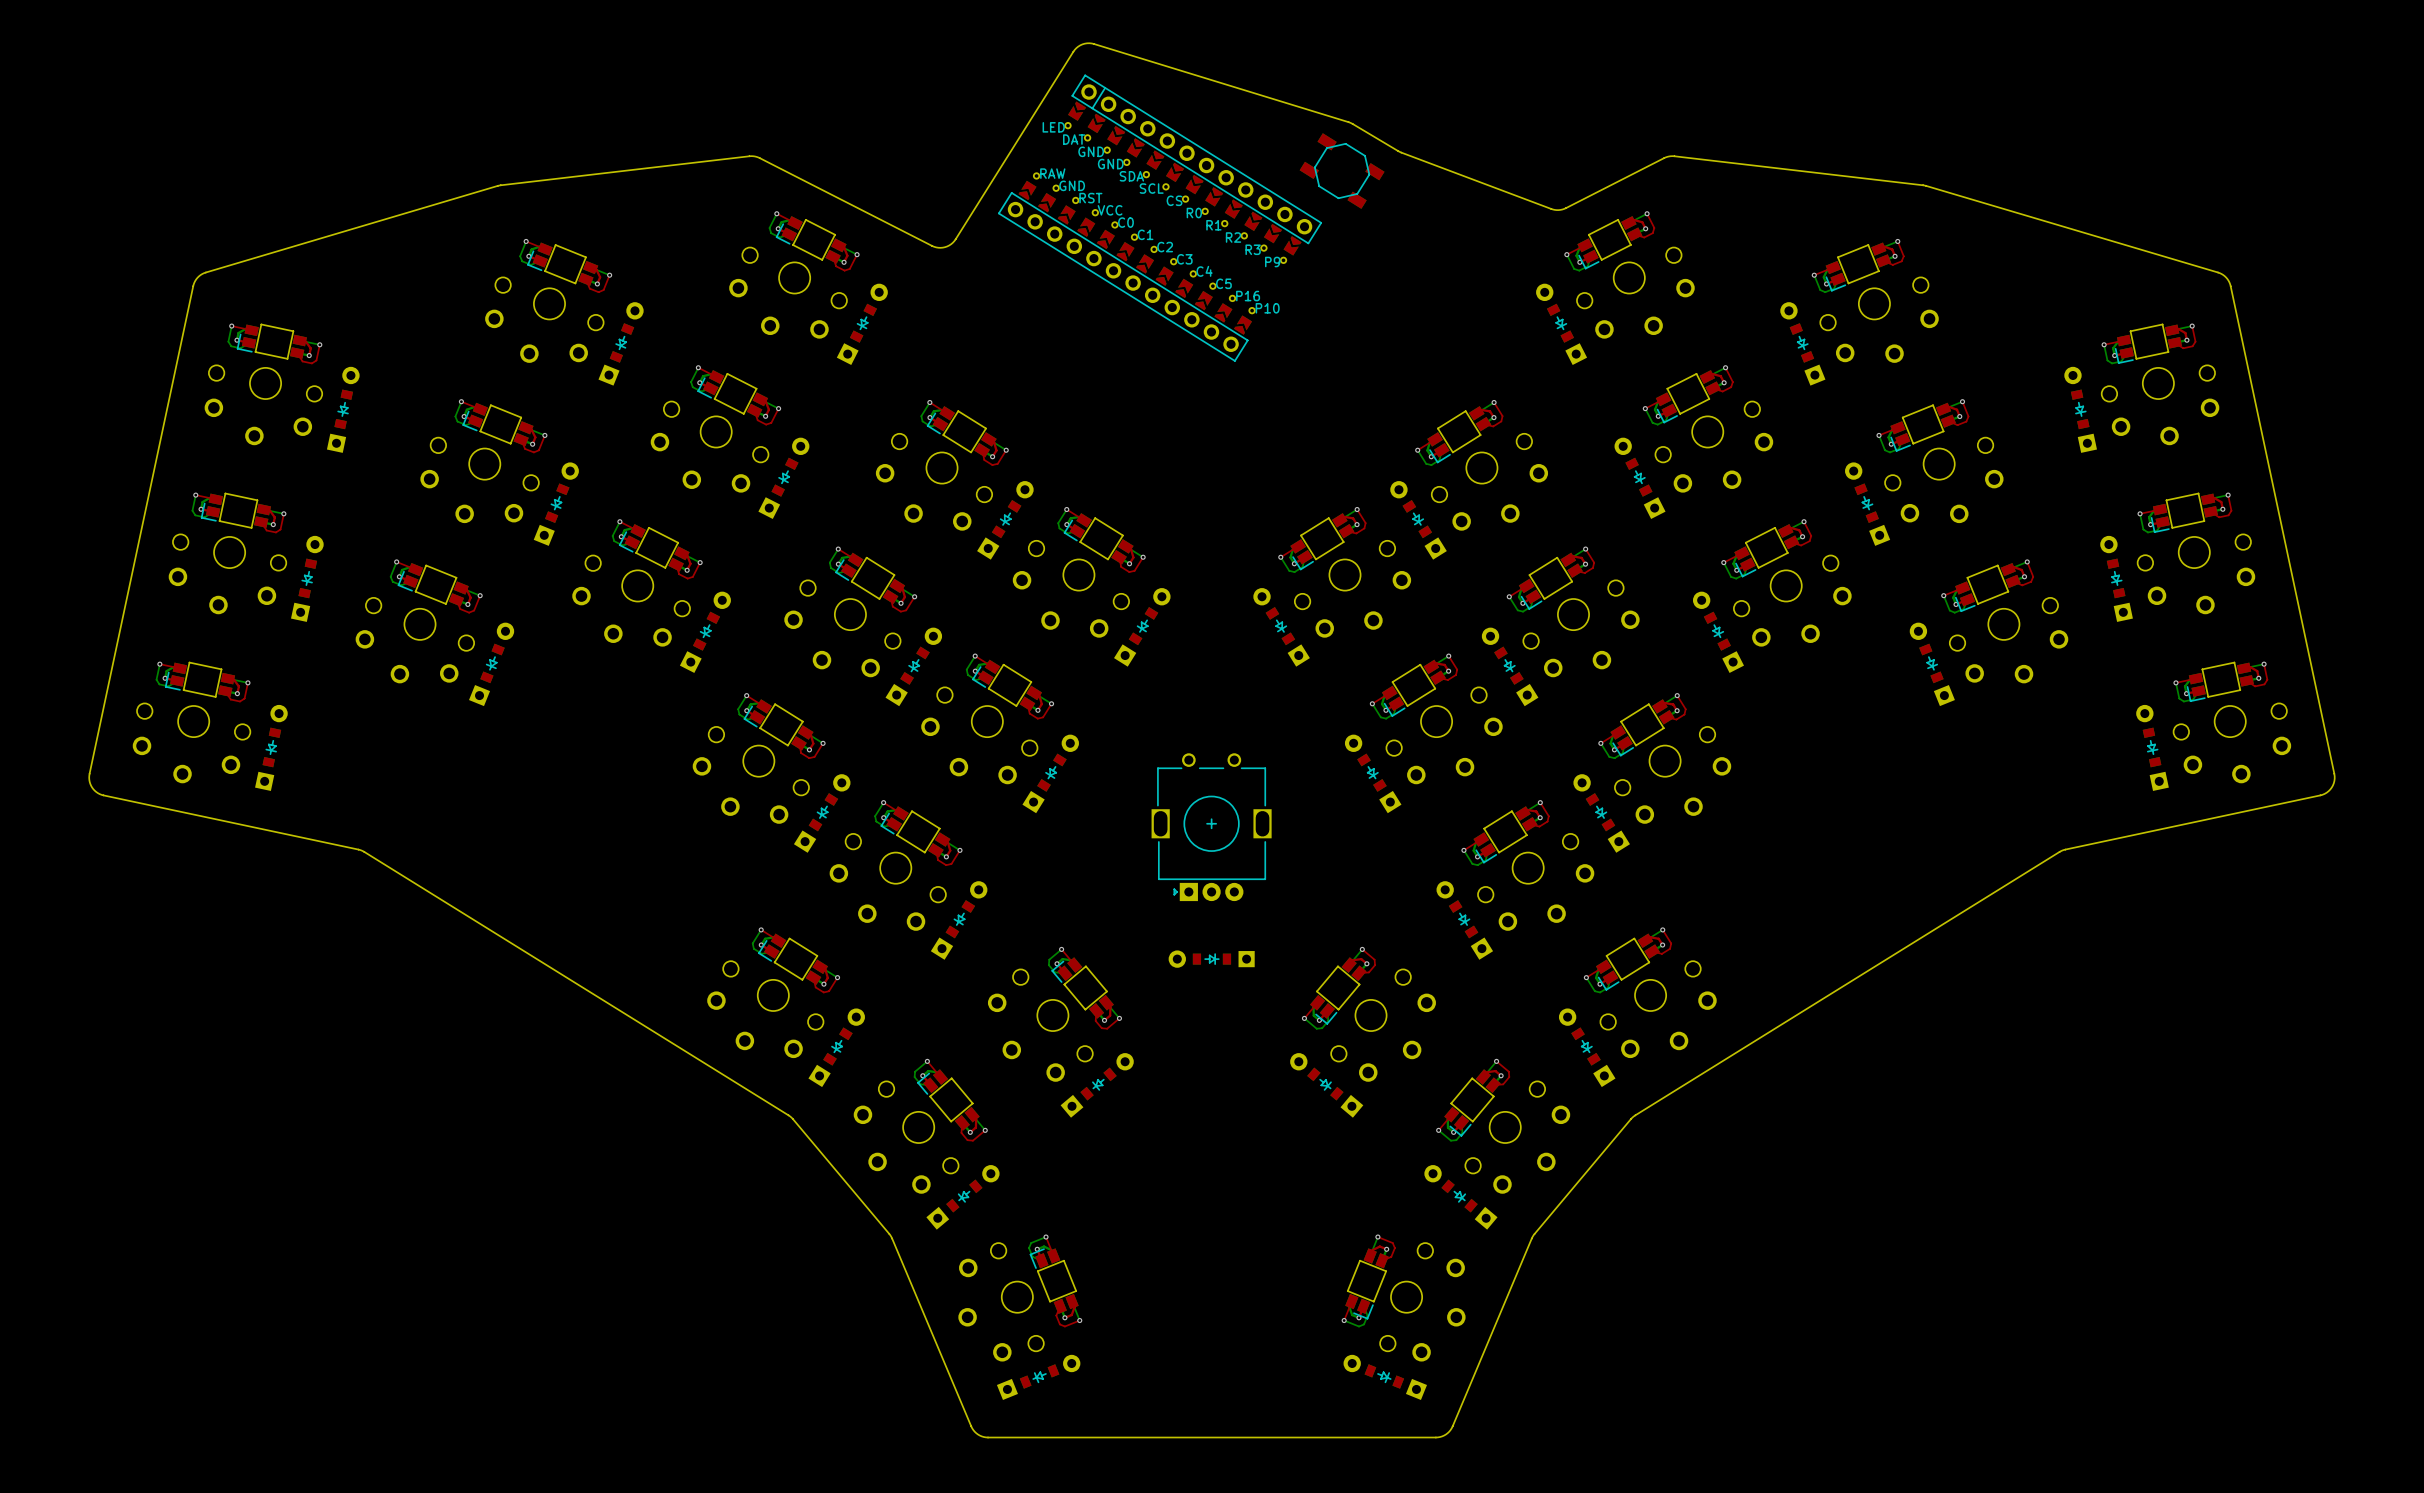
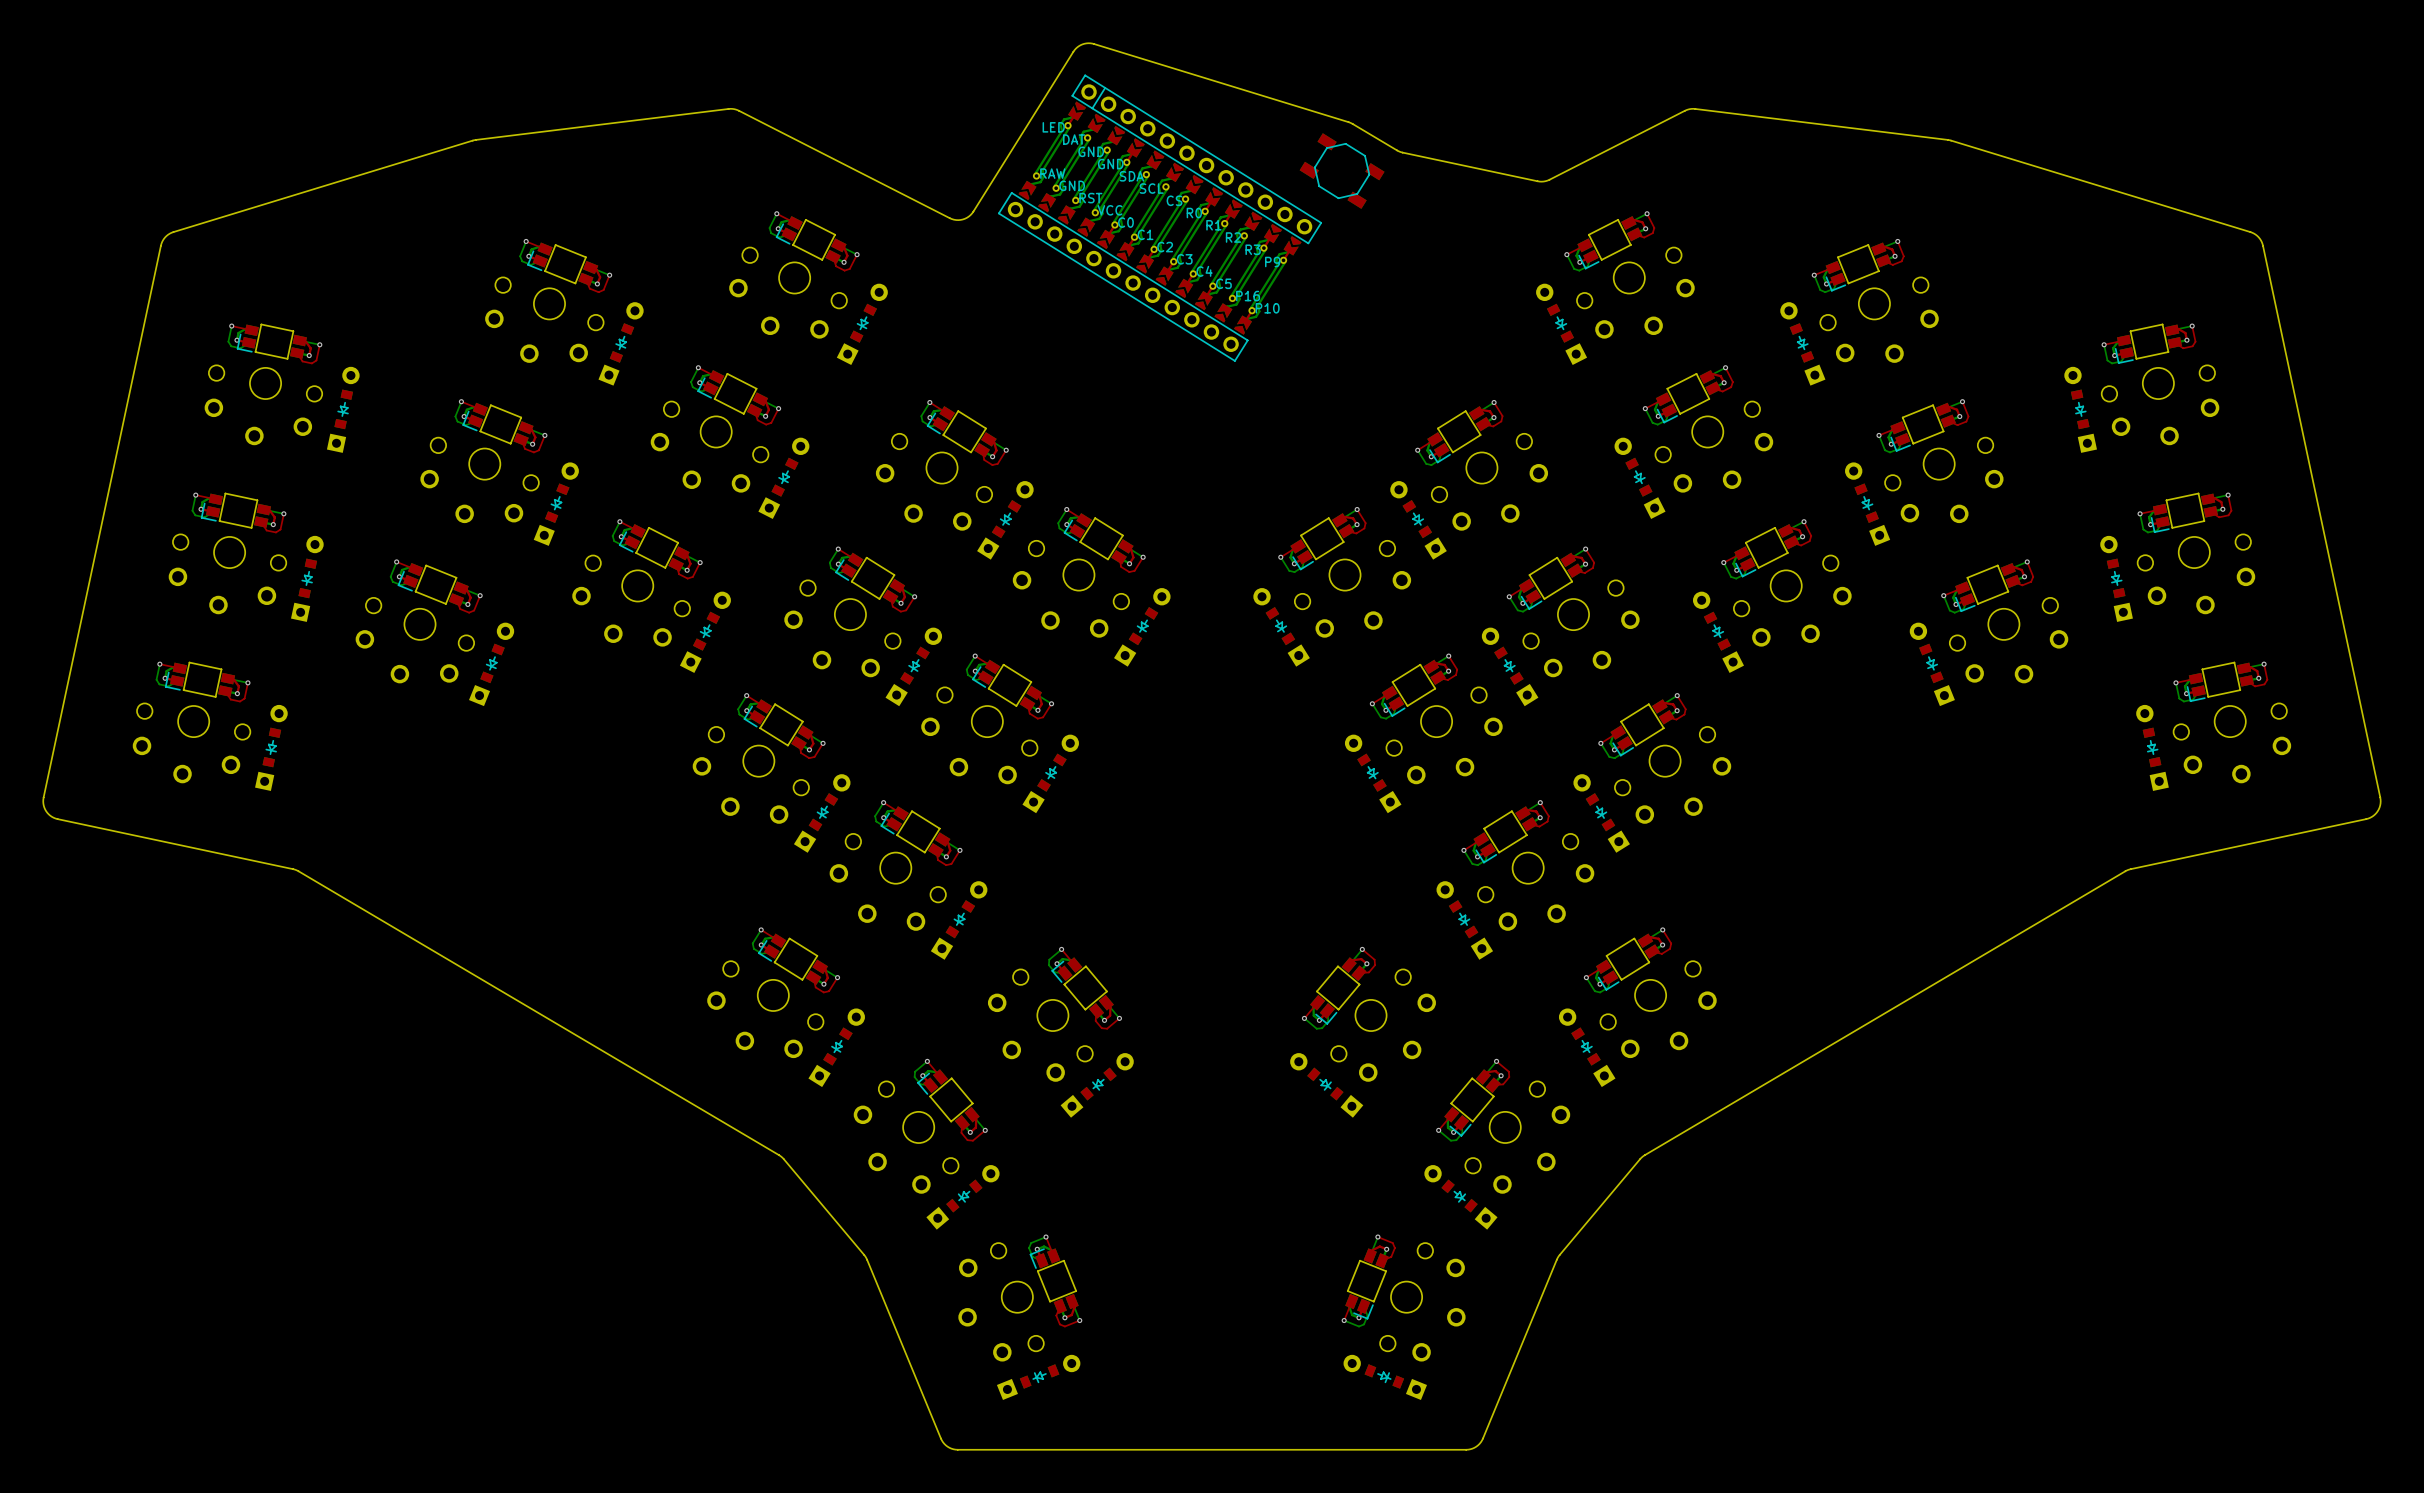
board edge: (1094, 44) (1084, 43) (1074, 49) (955, 239) (945, 247) (931, 245) (759, 158) (751, 156) (499, 185) (200, 275) (193, 286) (89, 775) (92, 787) (101, 794) (362, 851) (789, 1116) (890, 1236) (971, 1426) (981, 1436) (1435, 1437) (1444, 1435) (1452, 1426) (1532, 1236) (1634, 1116) (2060, 851) (2320, 795) (2328, 791) (2333, 783) (2334, 773) (2230, 286) (2223, 275) (1923, 185) (1670, 156) (1565, 208) (1556, 210) (1397, 150) -> (1094, 44) (1082, 44) (1074, 50) (973, 211) (967, 217) (960, 219) (949, 218) (739, 110) (730, 108) (474, 140) (168, 234) (160, 245) (43, 799) (46, 811) (55, 818) (297, 870) (780, 1156) (865, 1257) (940, 1438) (951, 1448) (1466, 1449) (1474, 1447) (1482, 1438) (1558, 1257) (1643, 1156) (2126, 870) (2366, 819) (2375, 814) (2379, 807) (2380, 797) (2263, 245) (2255, 234) (1949, 140) (1695, 108) (1684, 110) (1543, 181) (1397, 150)
top track: none -> (1075, 114) (1067, 125)
bottom track: none -> (1075, 114) (1073, 117) (1064, 119) (1060, 124) (1062, 130) (1035, 172) (1036, 175)
bottom track: none -> (1067, 125) (1068, 128) (1042, 172)
bottom track: none -> (1094, 126) (1092, 129) (1083, 131) (1080, 137) (1081, 143) (1055, 185) (1056, 188)
bottom track: none -> (1087, 137) (1088, 141) (1062, 184)
bottom track: none -> (1114, 138) (1112, 141) (1103, 143) (1099, 149) (1101, 155) (1074, 197) (1075, 200)
bottom track: none -> (1107, 150) (1107, 153) (1081, 196)
top track: none -> (1134, 150) (1126, 162)
bottom track: none -> (1134, 150) (1131, 154) (1122, 156) (1119, 161) (1120, 167) (1094, 209) (1095, 212)
bottom track: none -> (1126, 162) (1127, 165) (1101, 208)
bottom track: none -> (1153, 162) (1151, 166) (1142, 168) (1139, 173) (1140, 179) (1114, 221) (1114, 224)
bottom track: none -> (1042, 172) (1043, 176) (1040, 182) (1031, 184) (1029, 187)
bottom track: none -> (1146, 174) (1147, 177) (1121, 220)
bottom track: none -> (1173, 175) (1171, 178) (1162, 180) (1158, 186) (1160, 191) (1133, 234) (1134, 237)
bottom track: none -> (1062, 184) (1063, 189) (1060, 194) (1050, 196) (1048, 199)
bottom track: none -> (1165, 186) (1166, 189) (1140, 232) (1141, 237) (1138, 243) (1129, 245) (1127, 248)
bottom track: none -> (1192, 187) (1190, 190) (1181, 192) (1178, 198) (1179, 204) (1153, 246) (1154, 249)
bottom track: none -> (1081, 196) (1082, 201) (1079, 206) (1070, 208) (1068, 212)
bottom track: none -> (1185, 199) (1186, 202) (1160, 245)
top track: none -> (1212, 199) (1205, 211)
bottom track: none -> (1212, 199) (1210, 203) (1201, 205) (1197, 210) (1199, 216) (1172, 258) (1173, 261)
bottom track: none -> (1101, 208) (1102, 213) (1099, 218) (1090, 220) (1088, 224)
bottom track: none -> (1205, 211) (1205, 214) (1179, 257)
top track: none -> (1232, 211) (1224, 223)
bottom track: none -> (1232, 211) (1229, 215) (1220, 217) (1217, 222) (1218, 228) (1192, 270) (1193, 273)
bottom track: none -> (1121, 221) (1122, 225) (1118, 231) (1109, 233) (1107, 236)
bottom track: none -> (1224, 223) (1225, 226) (1199, 269)
top track: none -> (1114, 224) (1107, 236)
bottom track: none -> (1251, 224) (1249, 227) (1240, 229) (1237, 234) (1238, 240) (1212, 283) (1212, 286)
bottom track: none -> (1244, 235) (1245, 238) (1218, 282)
top track: none -> (1271, 236) (1263, 248)
bottom track: none -> (1271, 236) (1269, 239) (1259, 241) (1256, 247) (1257, 253) (1231, 295) (1232, 298)
top track: none -> (1134, 237) (1127, 248)
bottom track: none -> (1160, 245) (1161, 250) (1158, 255) (1148, 257) (1146, 261)
bottom track: none -> (1263, 248) (1264, 251) (1238, 293) (1239, 299) (1236, 304) (1227, 306) (1225, 310)
top track: none -> (1290, 248) (1283, 260)
bottom track: none -> (1290, 248) (1288, 252) (1279, 254) (1276, 259) (1277, 265) (1251, 307) (1252, 310)
top track: none -> (1154, 249) (1146, 261)
bottom track: none -> (1179, 257) (1180, 262) (1177, 267) (1168, 269) (1166, 273)
bottom track: none -> (1283, 260) (1284, 263) (1258, 306)
top track: none -> (1173, 261) (1166, 273)
bottom track: none -> (1199, 270) (1200, 274) (1197, 280) (1188, 282) (1186, 285)
top track: none -> (1193, 273) (1186, 285)
bottom track: none -> (1219, 282) (1220, 287) (1216, 292) (1207, 294) (1205, 297)
top track: none -> (1212, 286) (1205, 297)
bottom track: none -> (1258, 306) (1259, 311) (1255, 316) (1246, 318) (1244, 322)
top track: none -> (1252, 310) (1244, 322)
part: (1211, 827) -> none
part: (1211, 959) -> none

